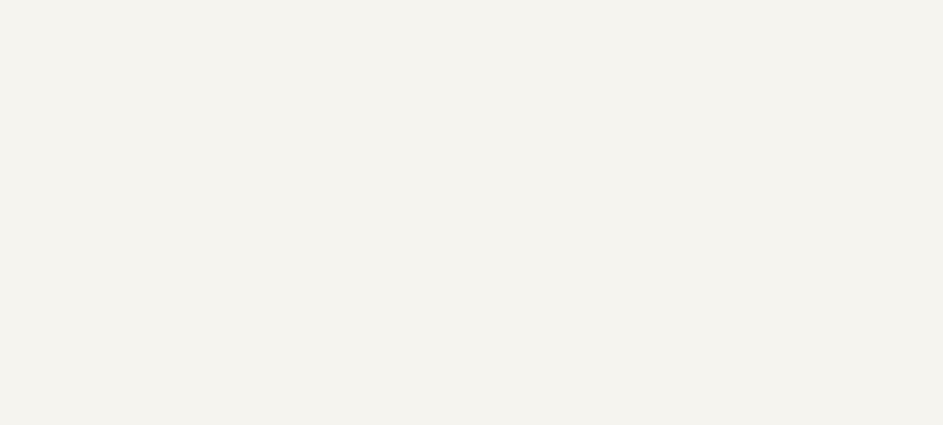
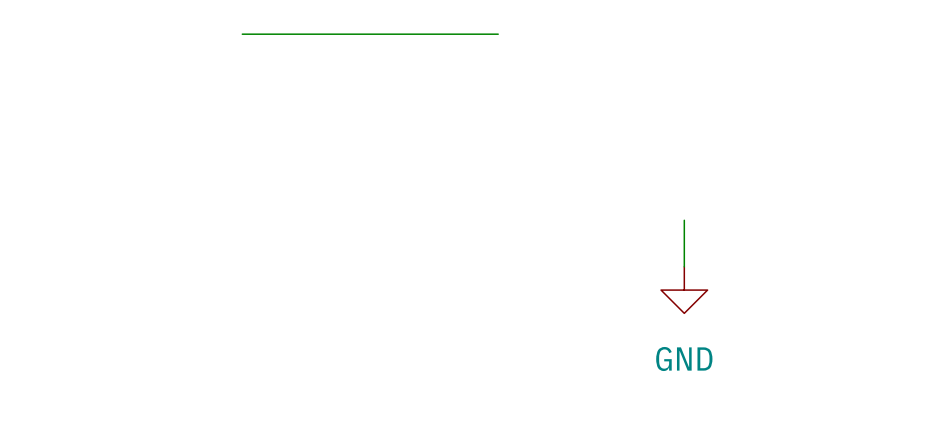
wire: none -> (242, 34) (498, 34)
wire: none -> (684, 220) (684, 266)
power symbol: none -> GND (684, 290)

